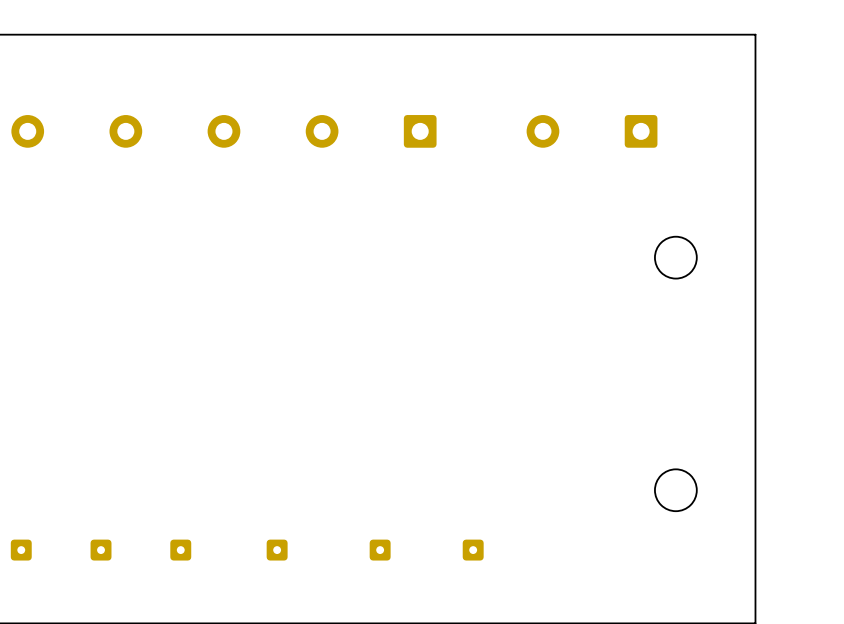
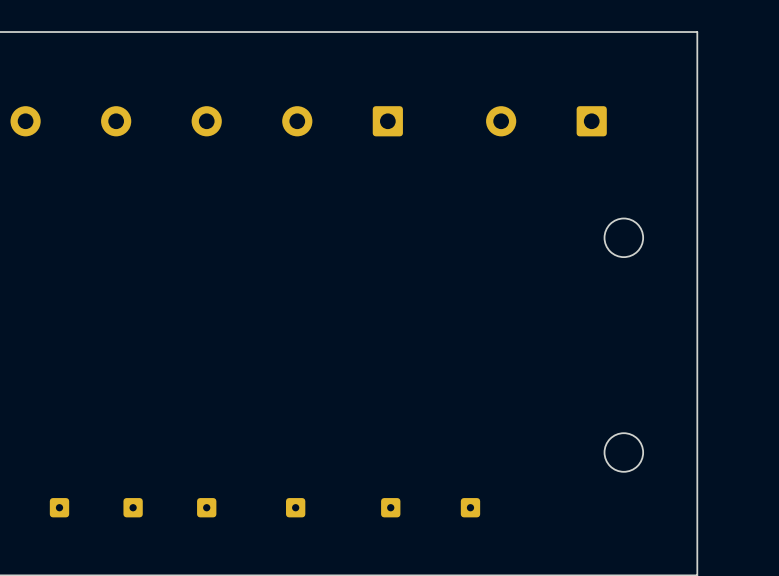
part: (21, 550) -> none
part: none -> (59, 507)
part: (101, 550) -> none
part: none -> (133, 507)
part: (180, 550) -> none
part: none -> (206, 507)
part: (277, 550) -> none
part: none -> (295, 507)
part: (380, 550) -> none
part: none -> (390, 507)
part: (473, 550) -> none
part: none -> (470, 507)

